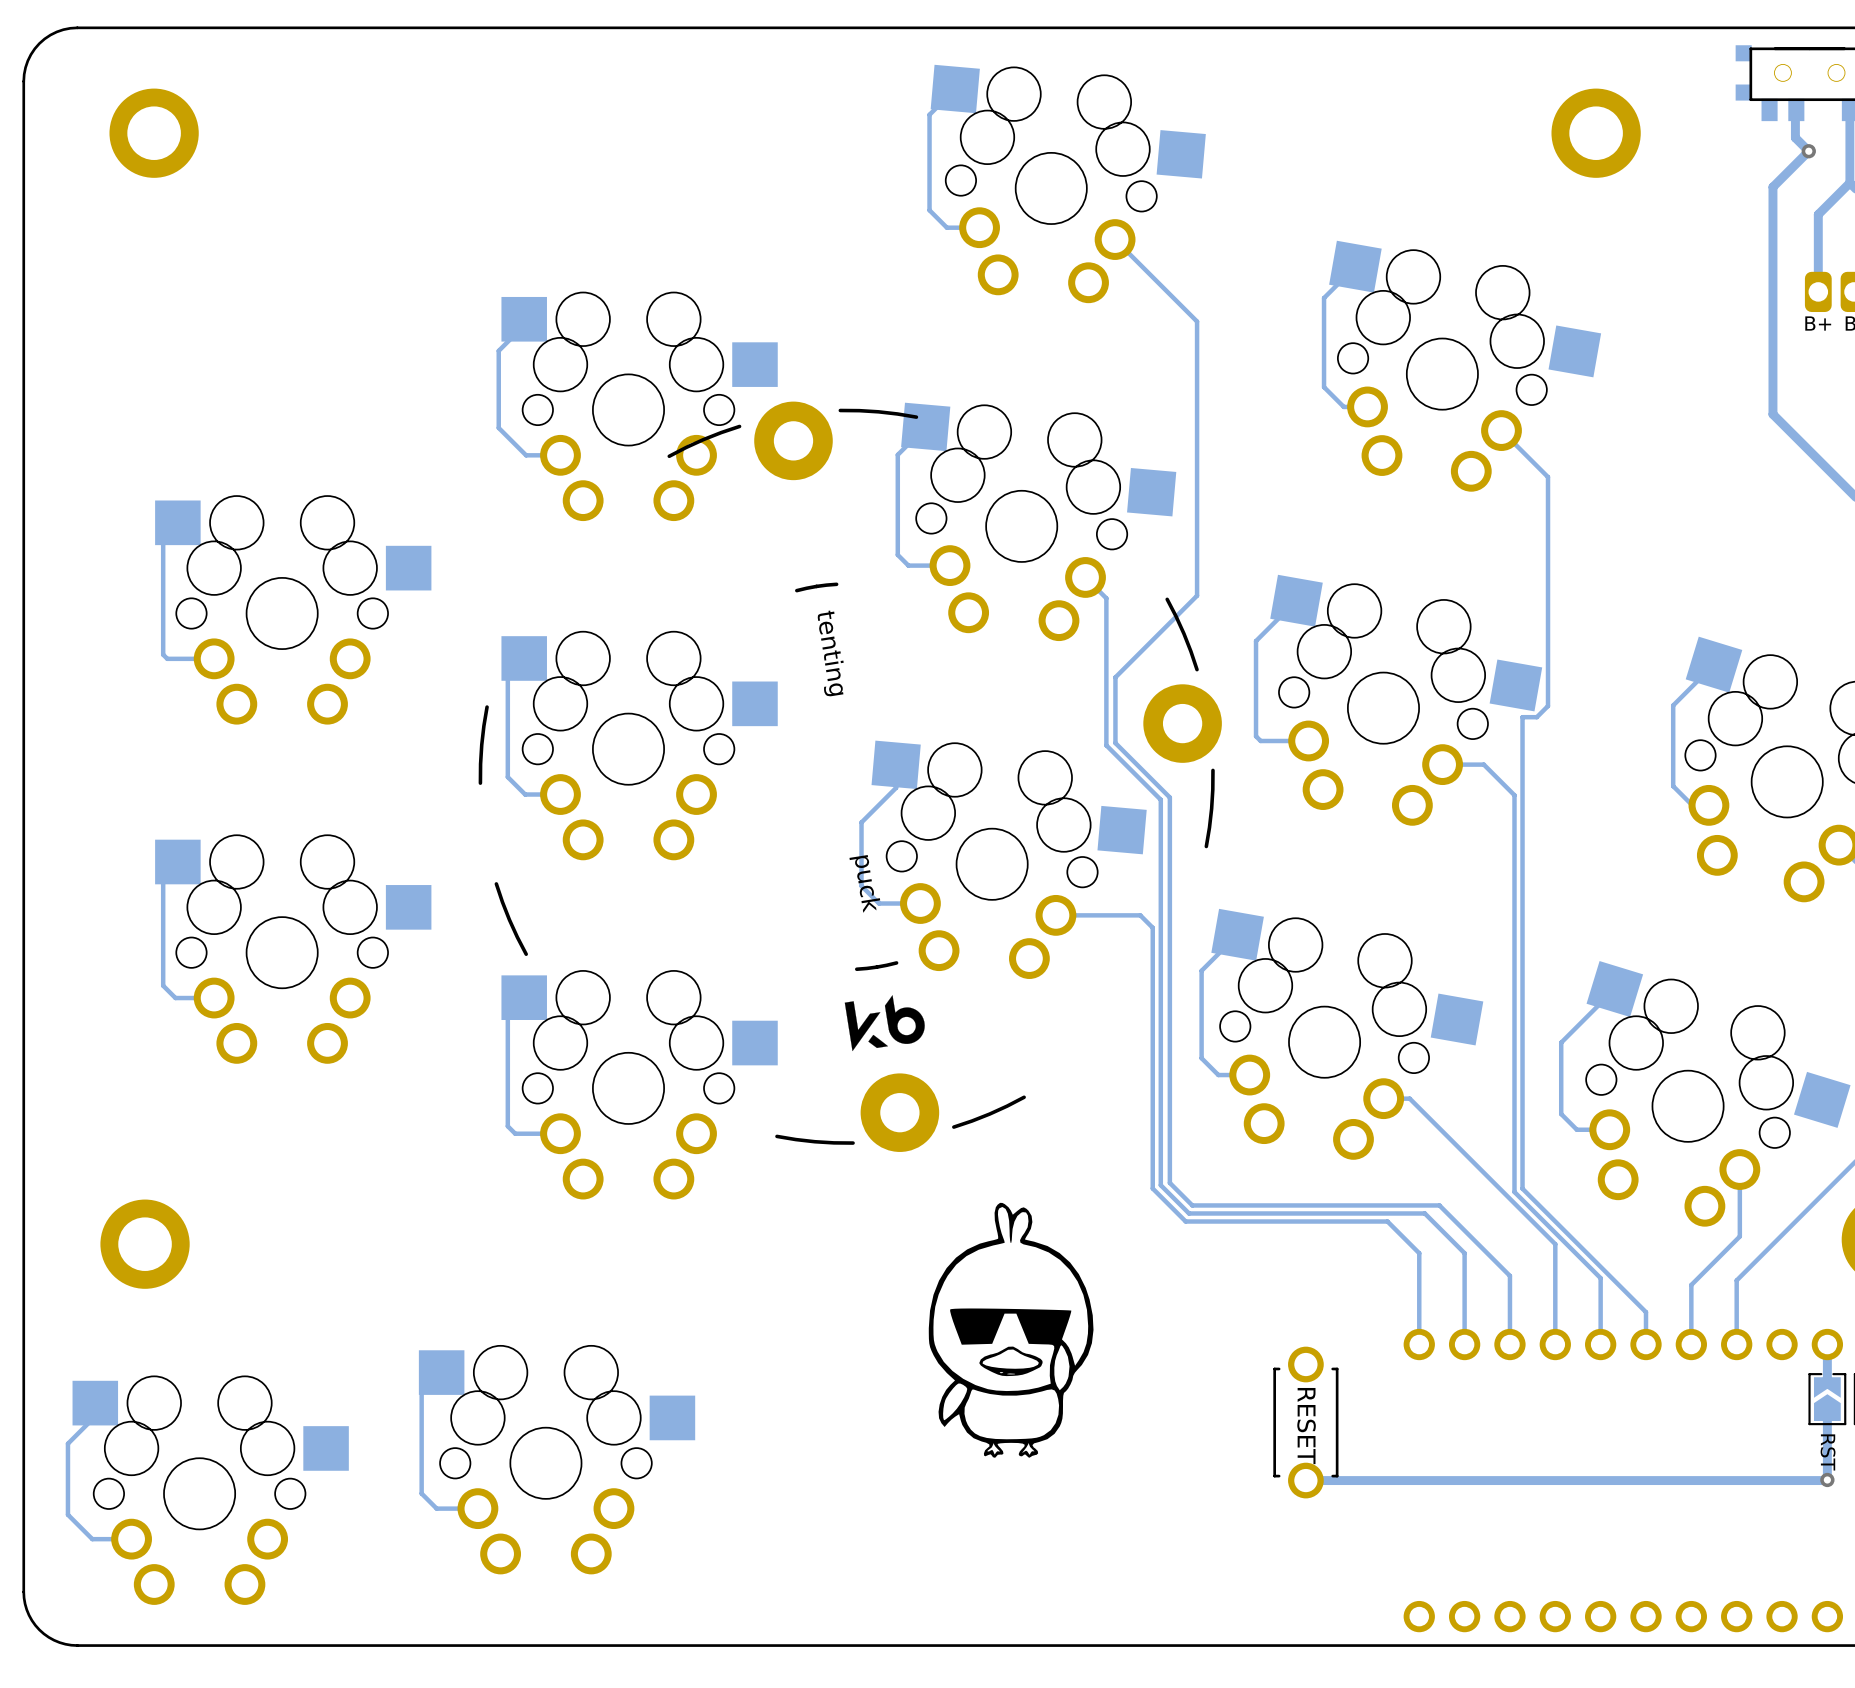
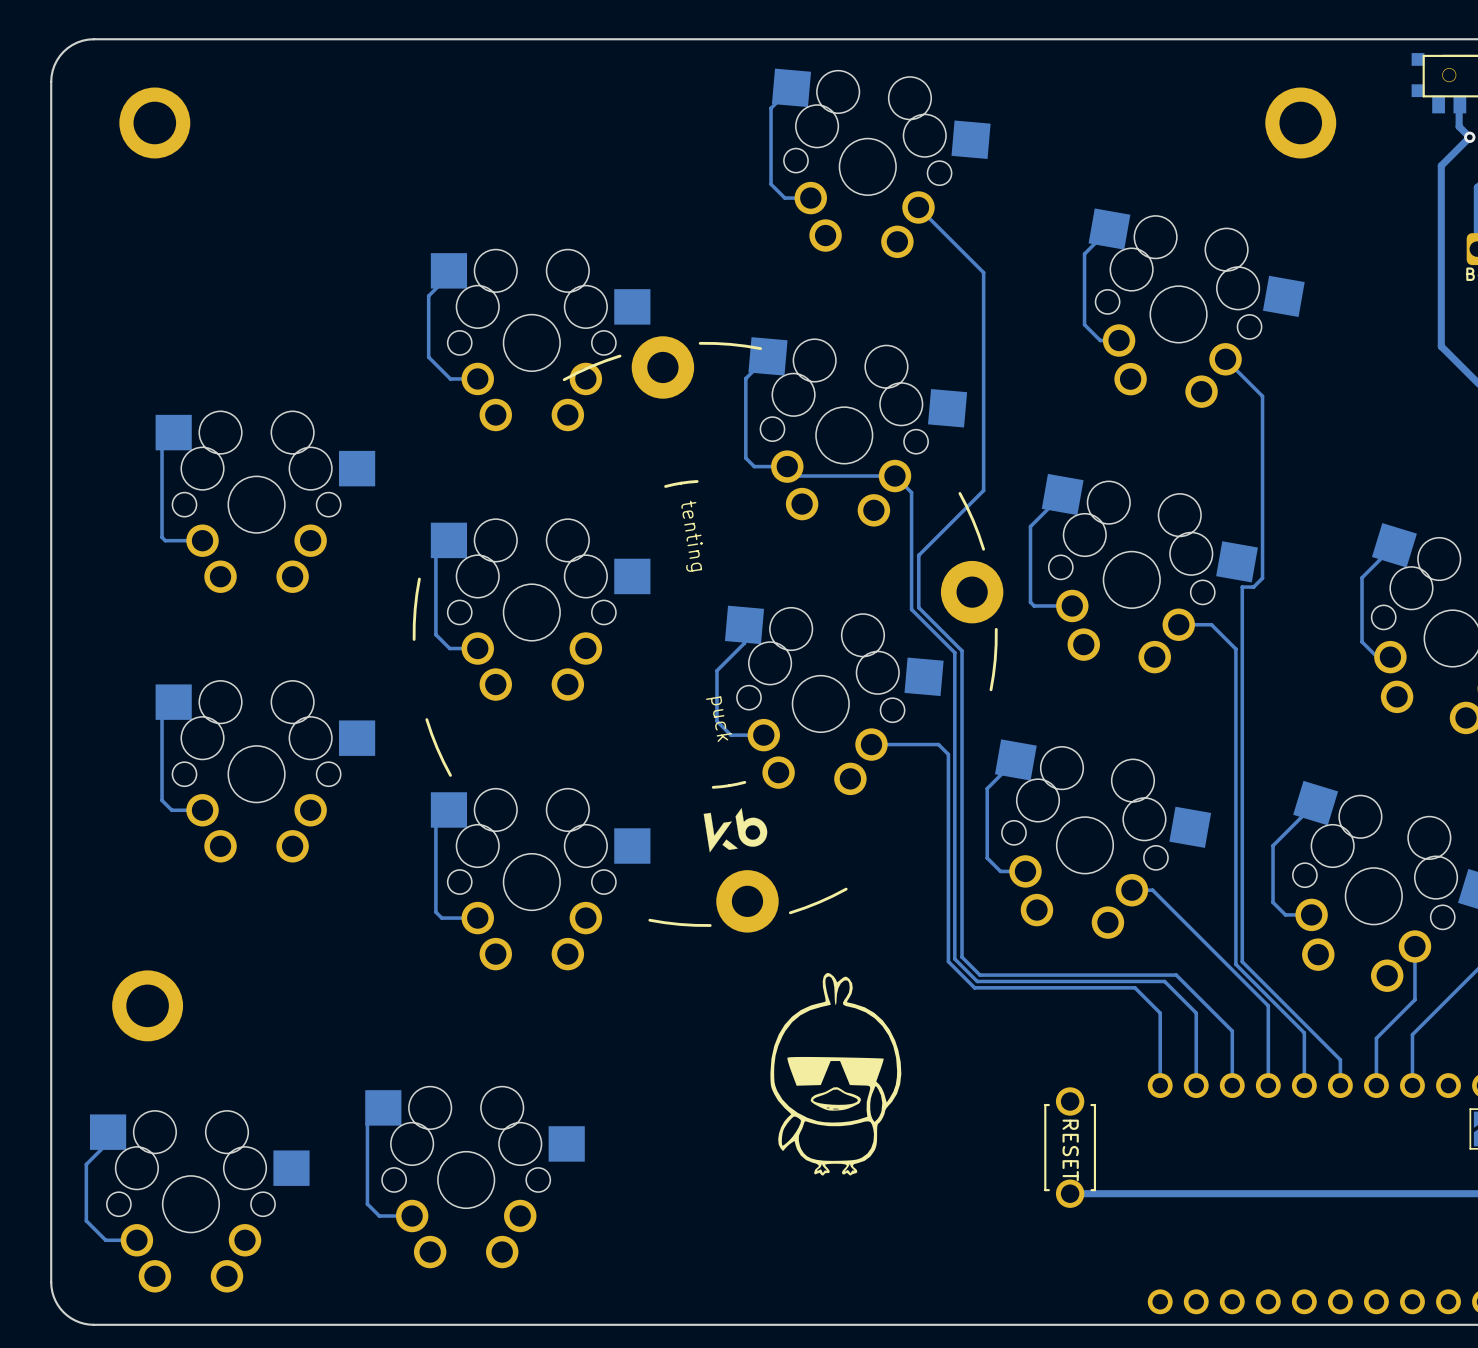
track: none -> (787, 466) (796, 476) (894, 476)

